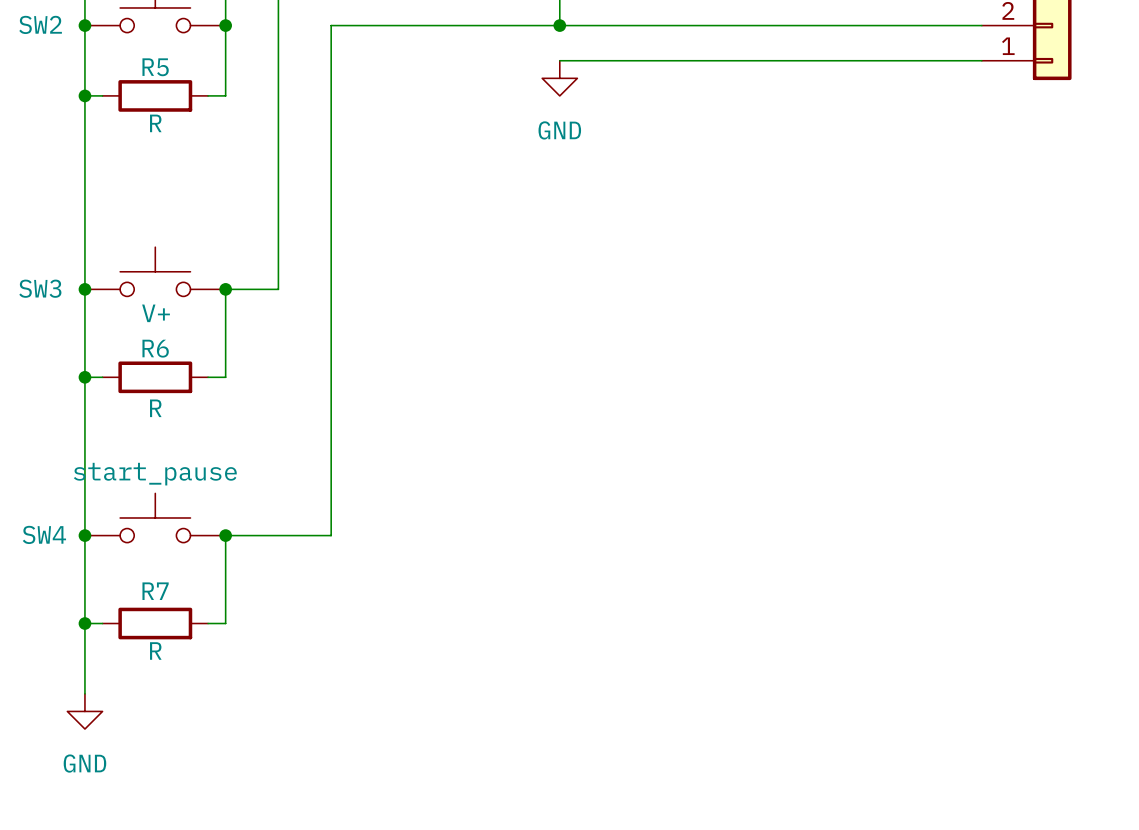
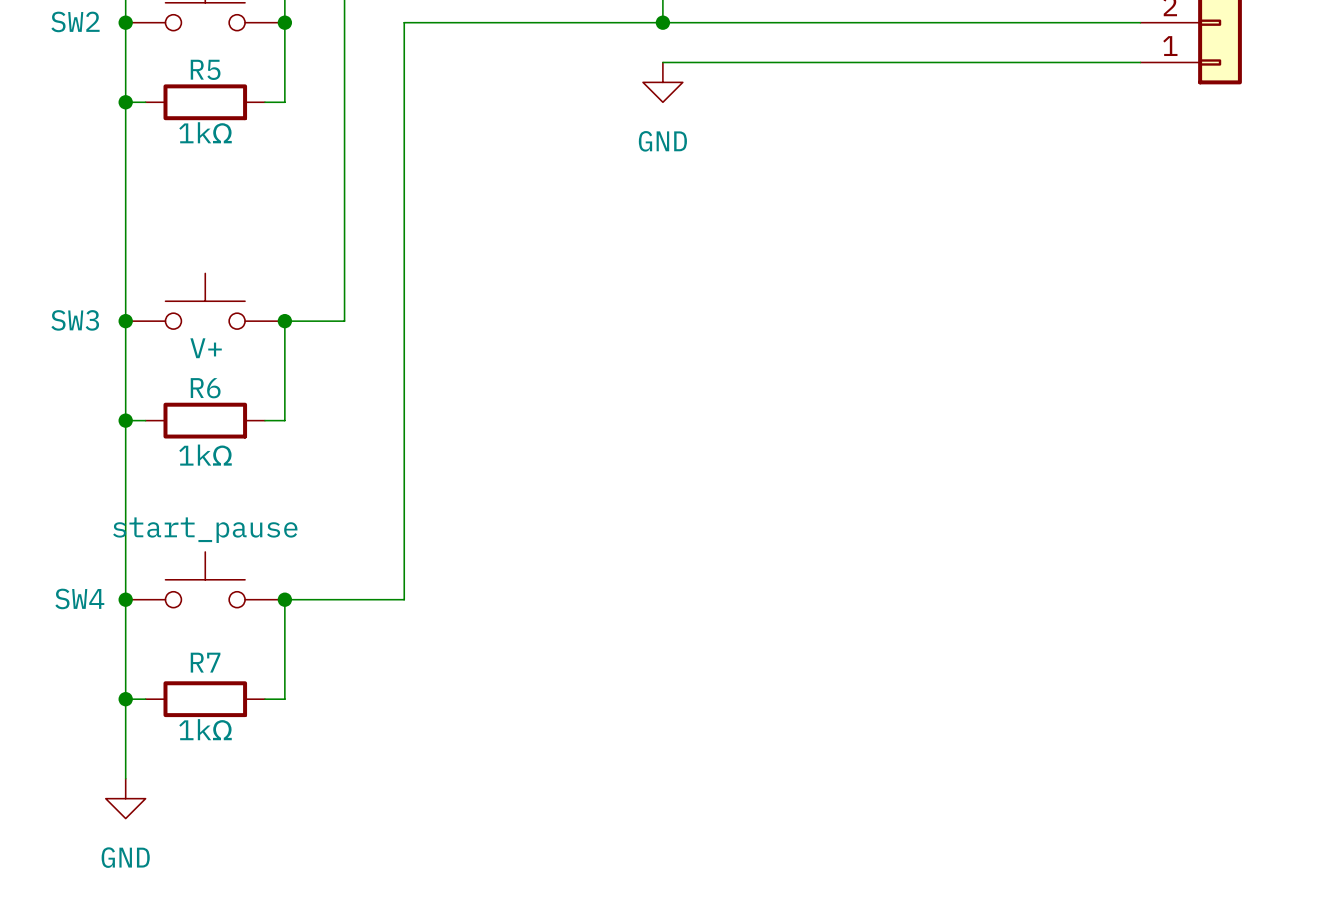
R5 value: R (155, 123) -> 1kΩ (205, 132)
R6 value: R (155, 408) -> 1kΩ (205, 455)
R7 value: R (155, 650) -> 1kΩ (205, 729)

